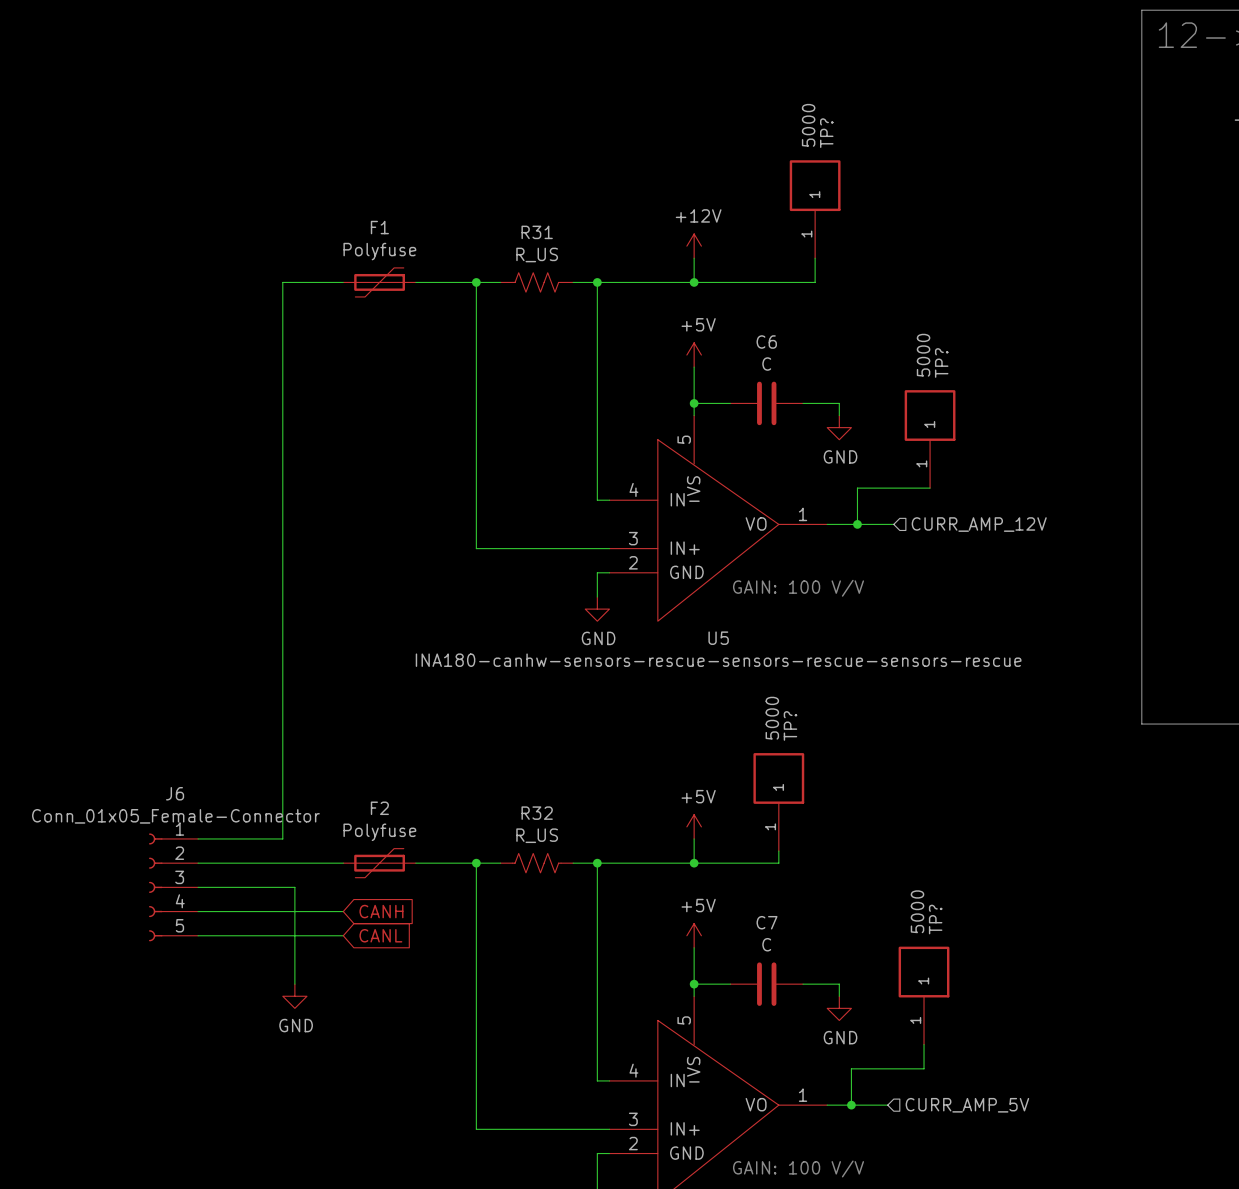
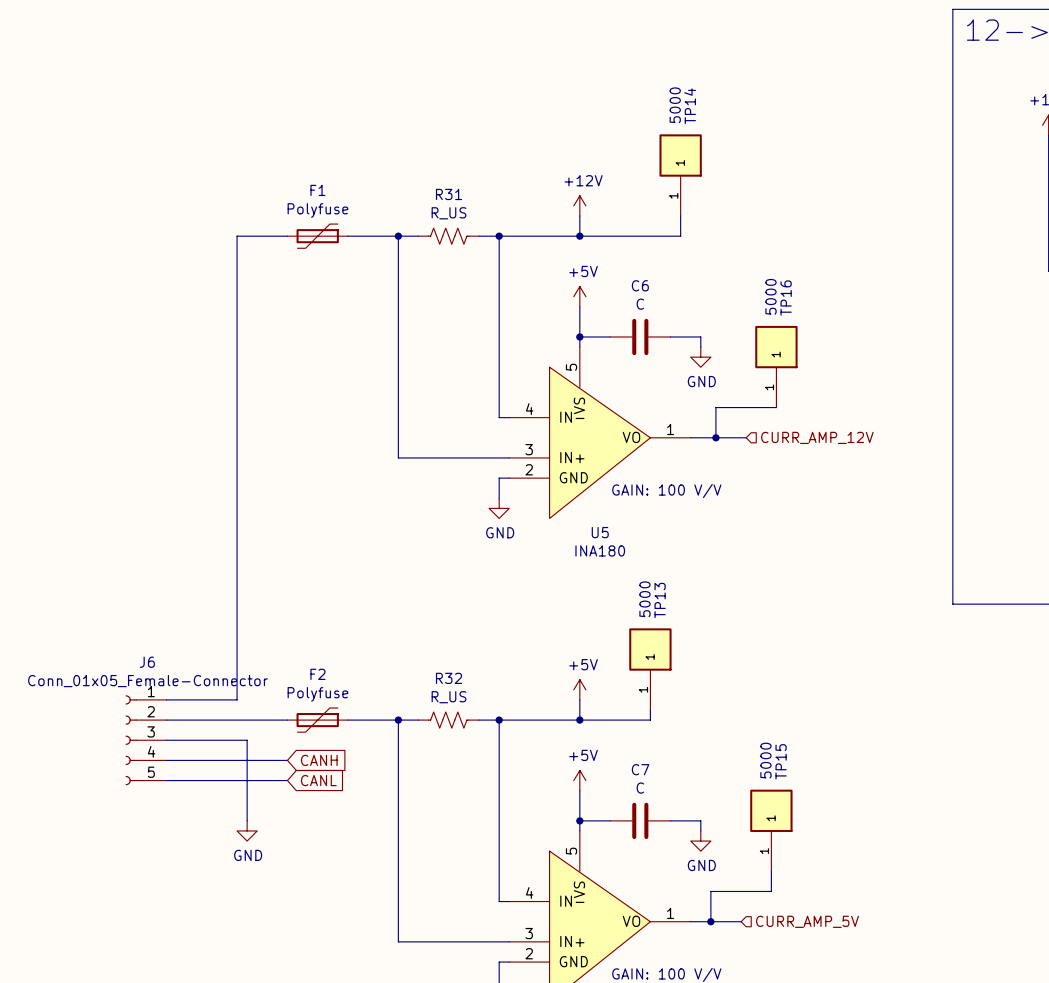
TP? name: TP? (826, 133) -> TP14 (690, 106)
TP? name: TP? (941, 363) -> TP16 (786, 298)
U5 value: INA180-canhw-sensors-rescue-sensors-rescue-sensors-rescue (718, 660) -> INA180 (600, 550)
TP? name: TP? (790, 725) -> TP13 (660, 600)
TP? name: TP? (935, 919) -> TP15 (781, 761)

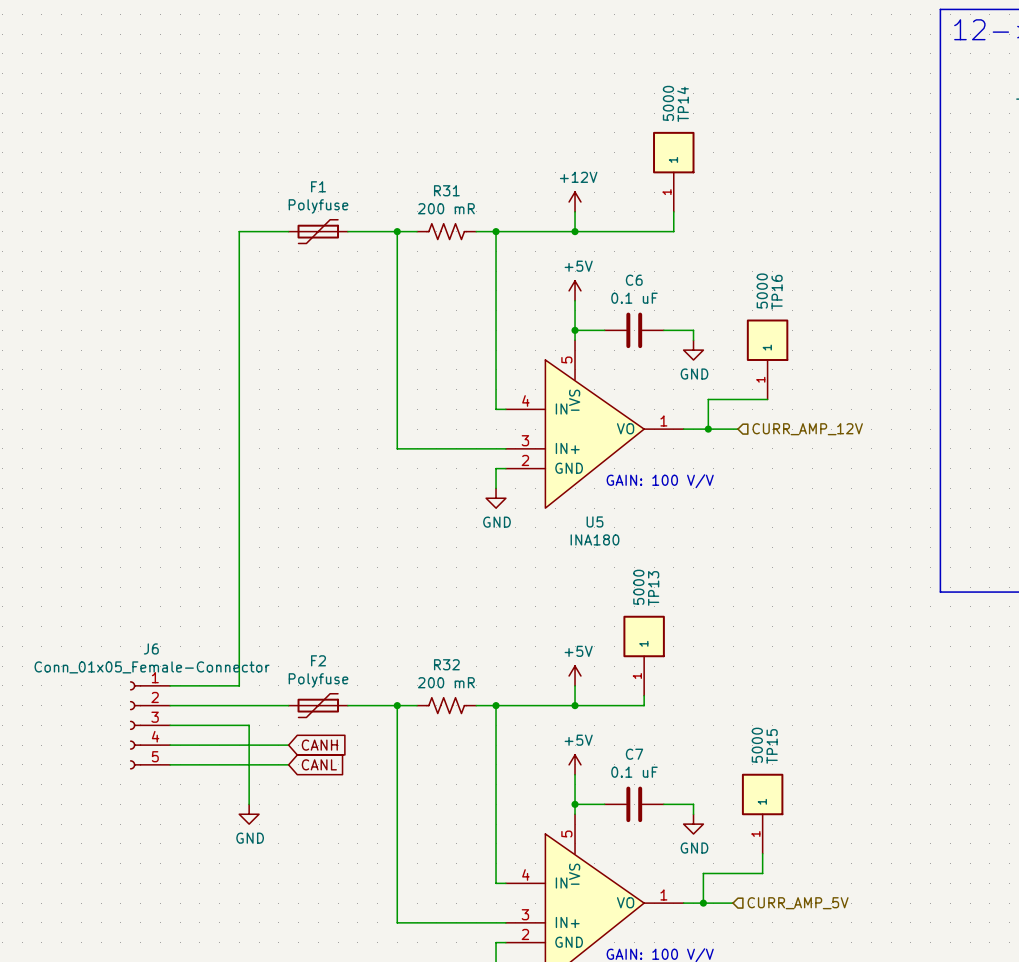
R31 value: R_US (449, 213) -> 200 mR (446, 208)
C6 value: C (640, 304) -> 0.1 uF (634, 298)
R32 value: R_US (449, 697) -> 200 mR (446, 682)
C7 value: C (640, 788) -> 0.1 uF (634, 772)

